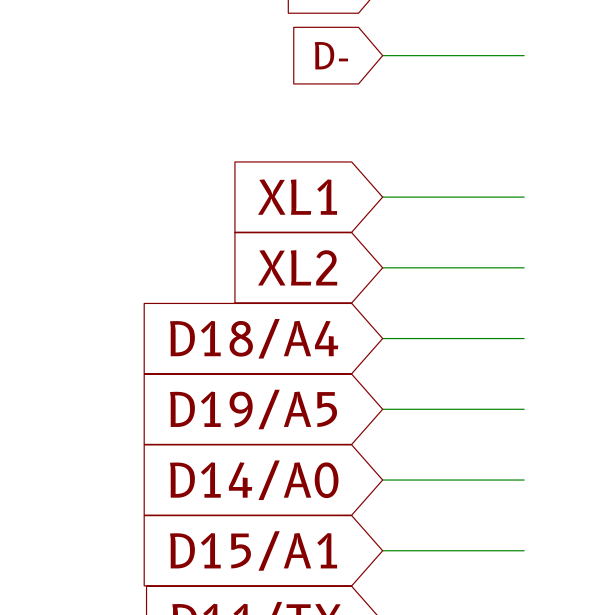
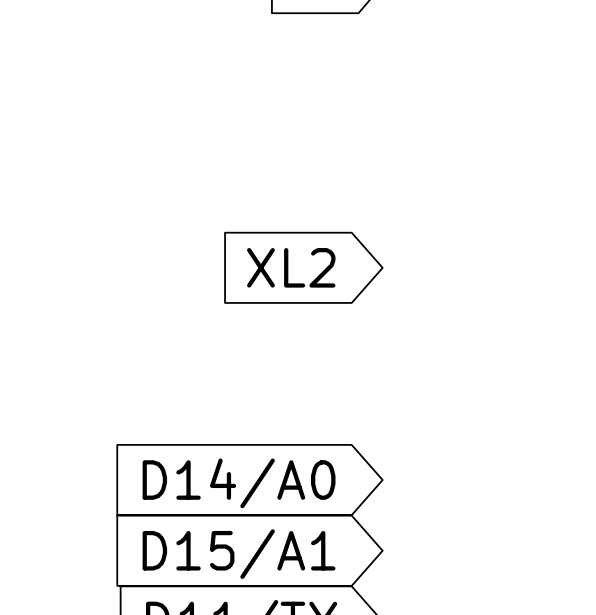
global label: D- (331, 55) -> none
wire: (382, 55) (524, 55) -> none
global label: XL1 (297, 197) -> none
wire: (382, 197) (524, 197) -> none
wire: (382, 267) (524, 267) -> none
global label: D18/A4 (254, 338) -> none
wire: (382, 338) (524, 338) -> none
global label: D19/A5 (253, 409) -> none
wire: (382, 409) (524, 409) -> none
wire: (382, 480) (524, 480) -> none
wire: (382, 550) (524, 550) -> none

